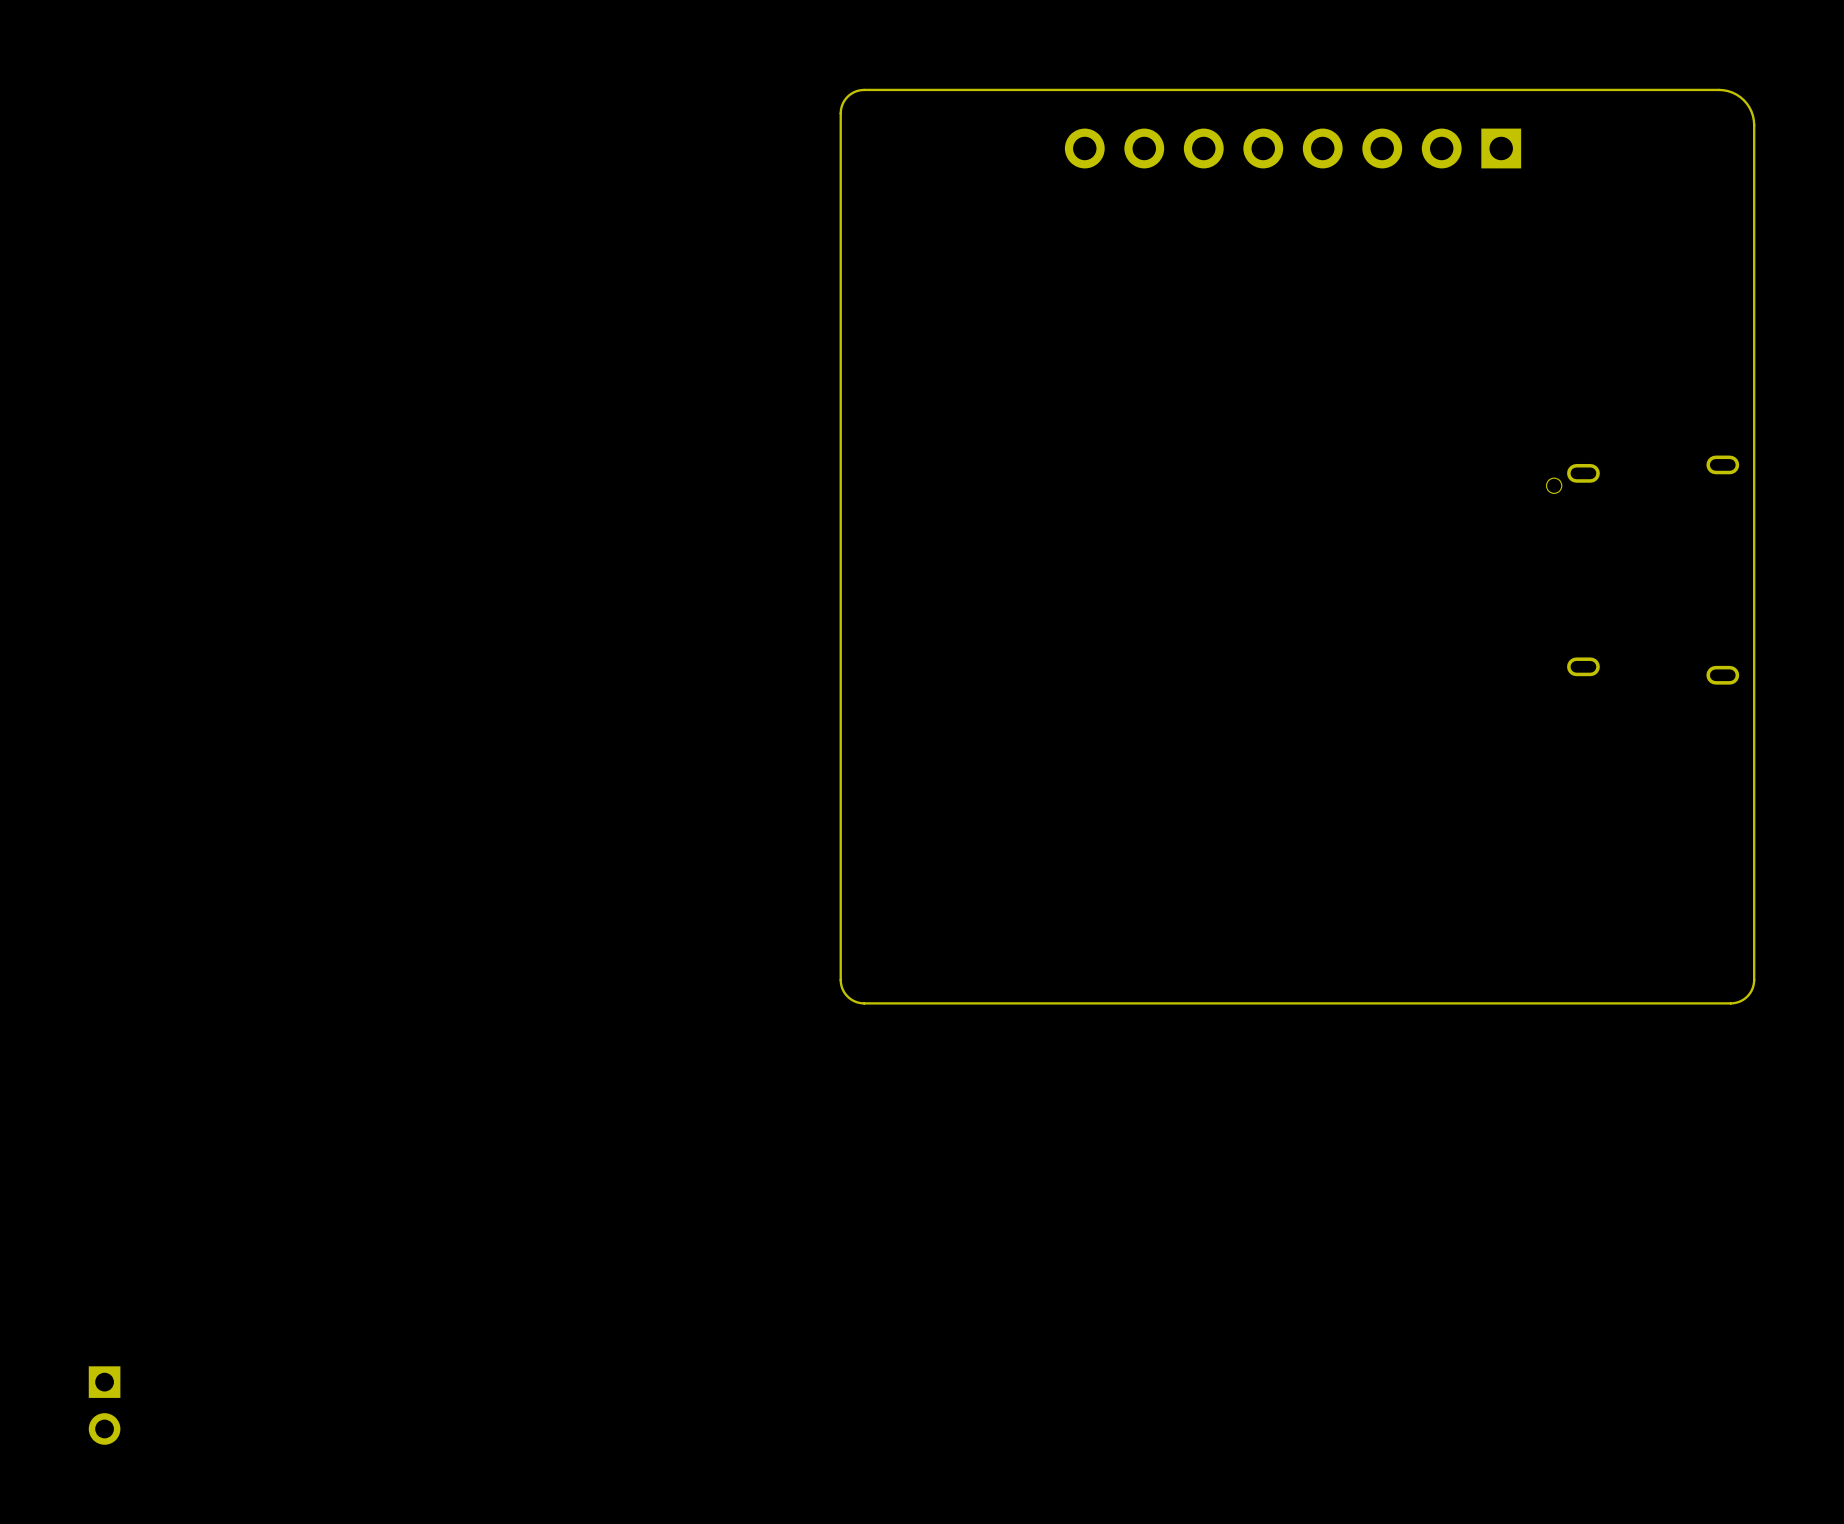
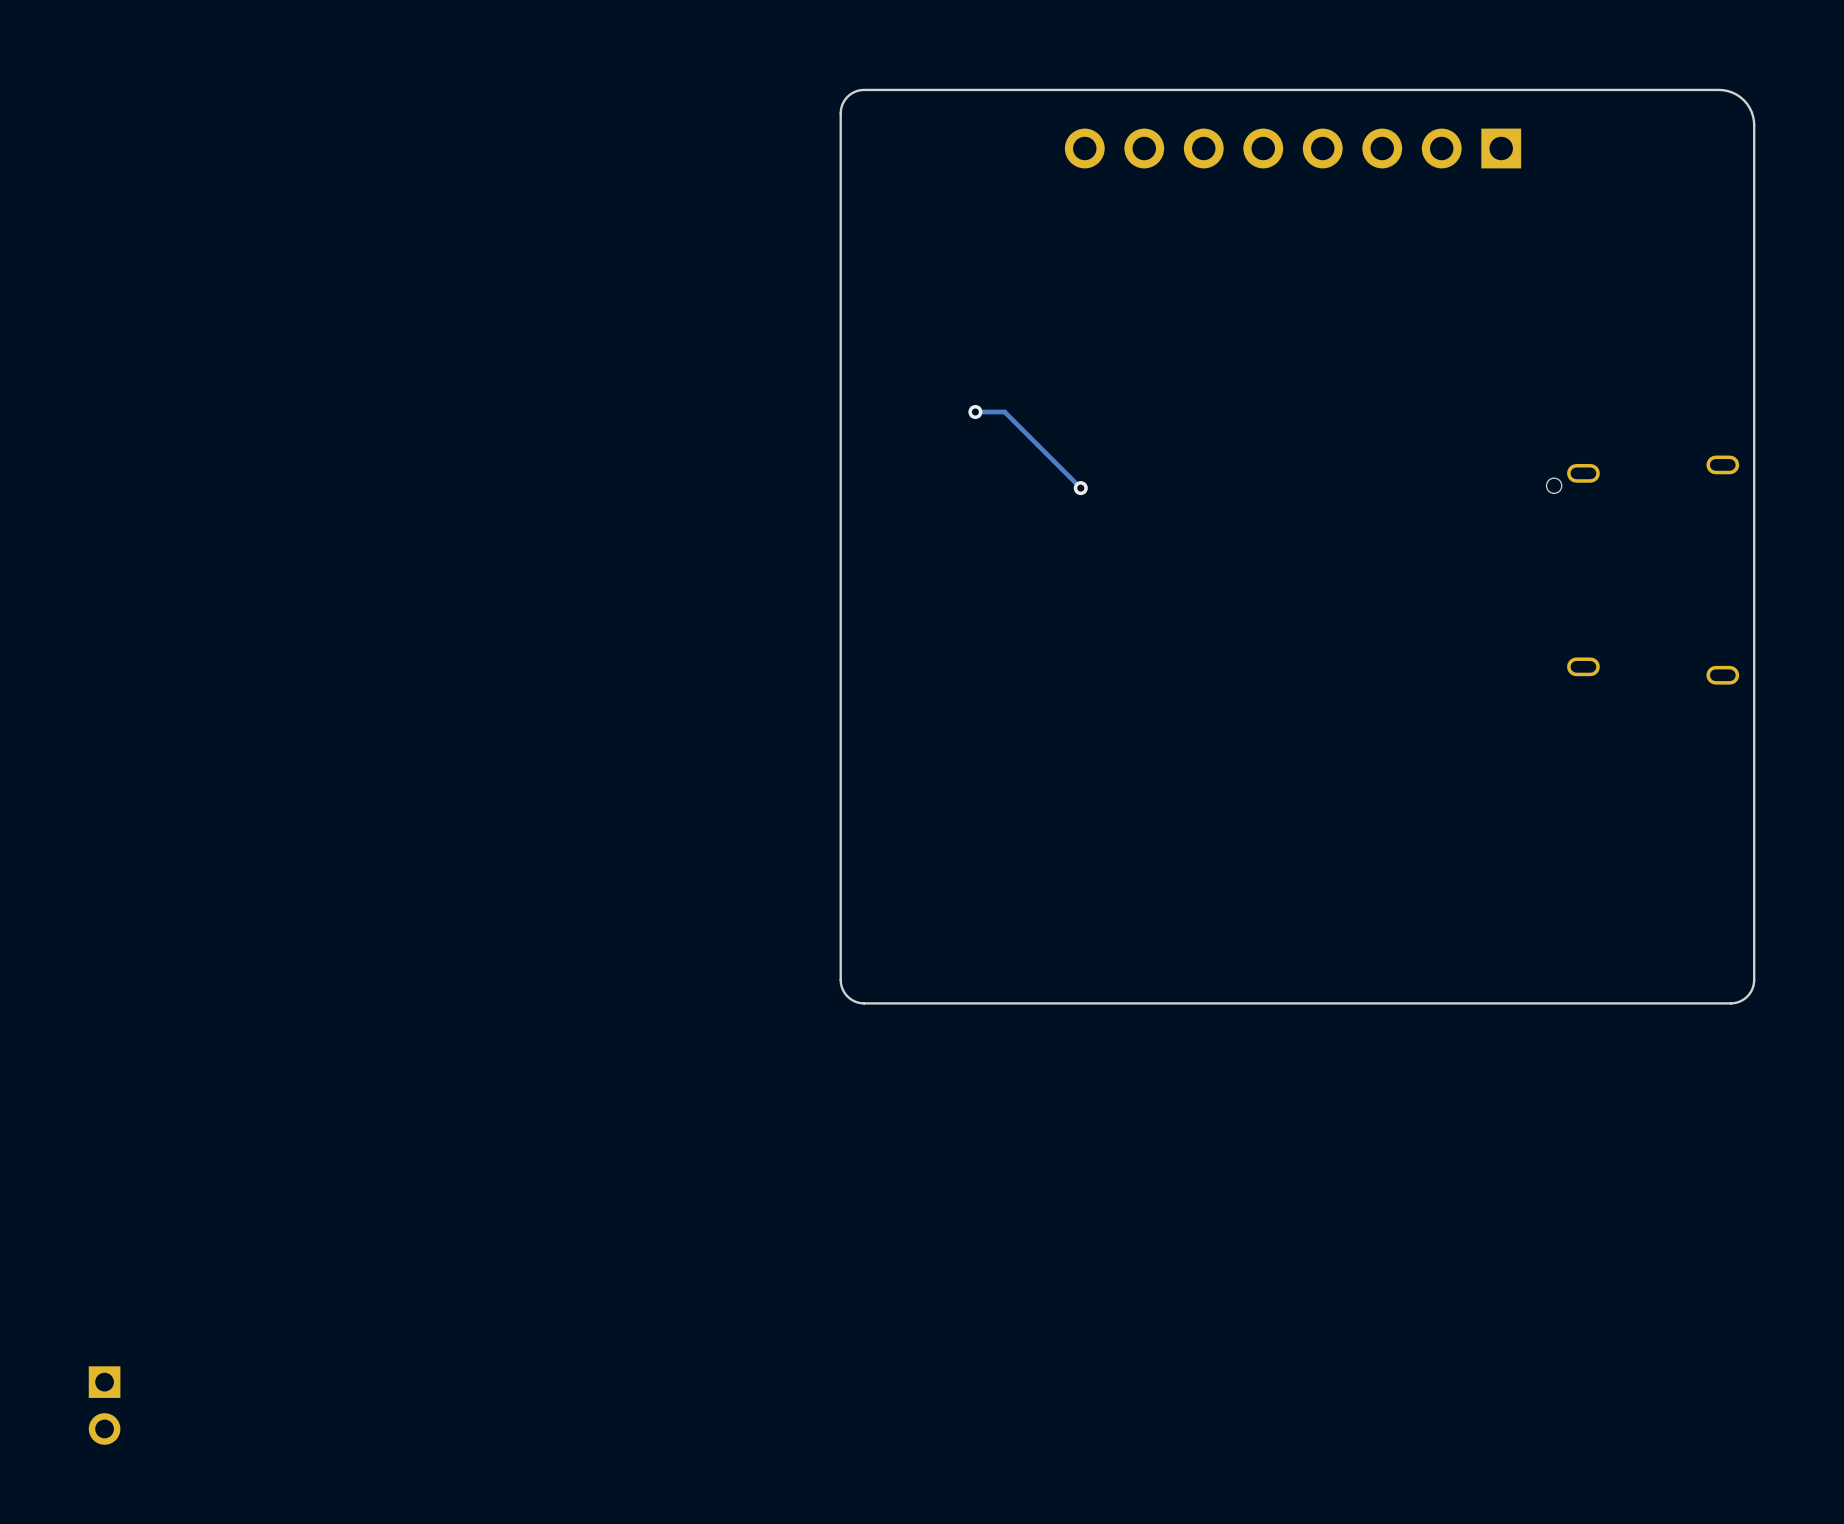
track: none -> (975, 411) (1004, 411) (1080, 488)
via: none -> (975, 411)
via: none -> (1080, 488)

